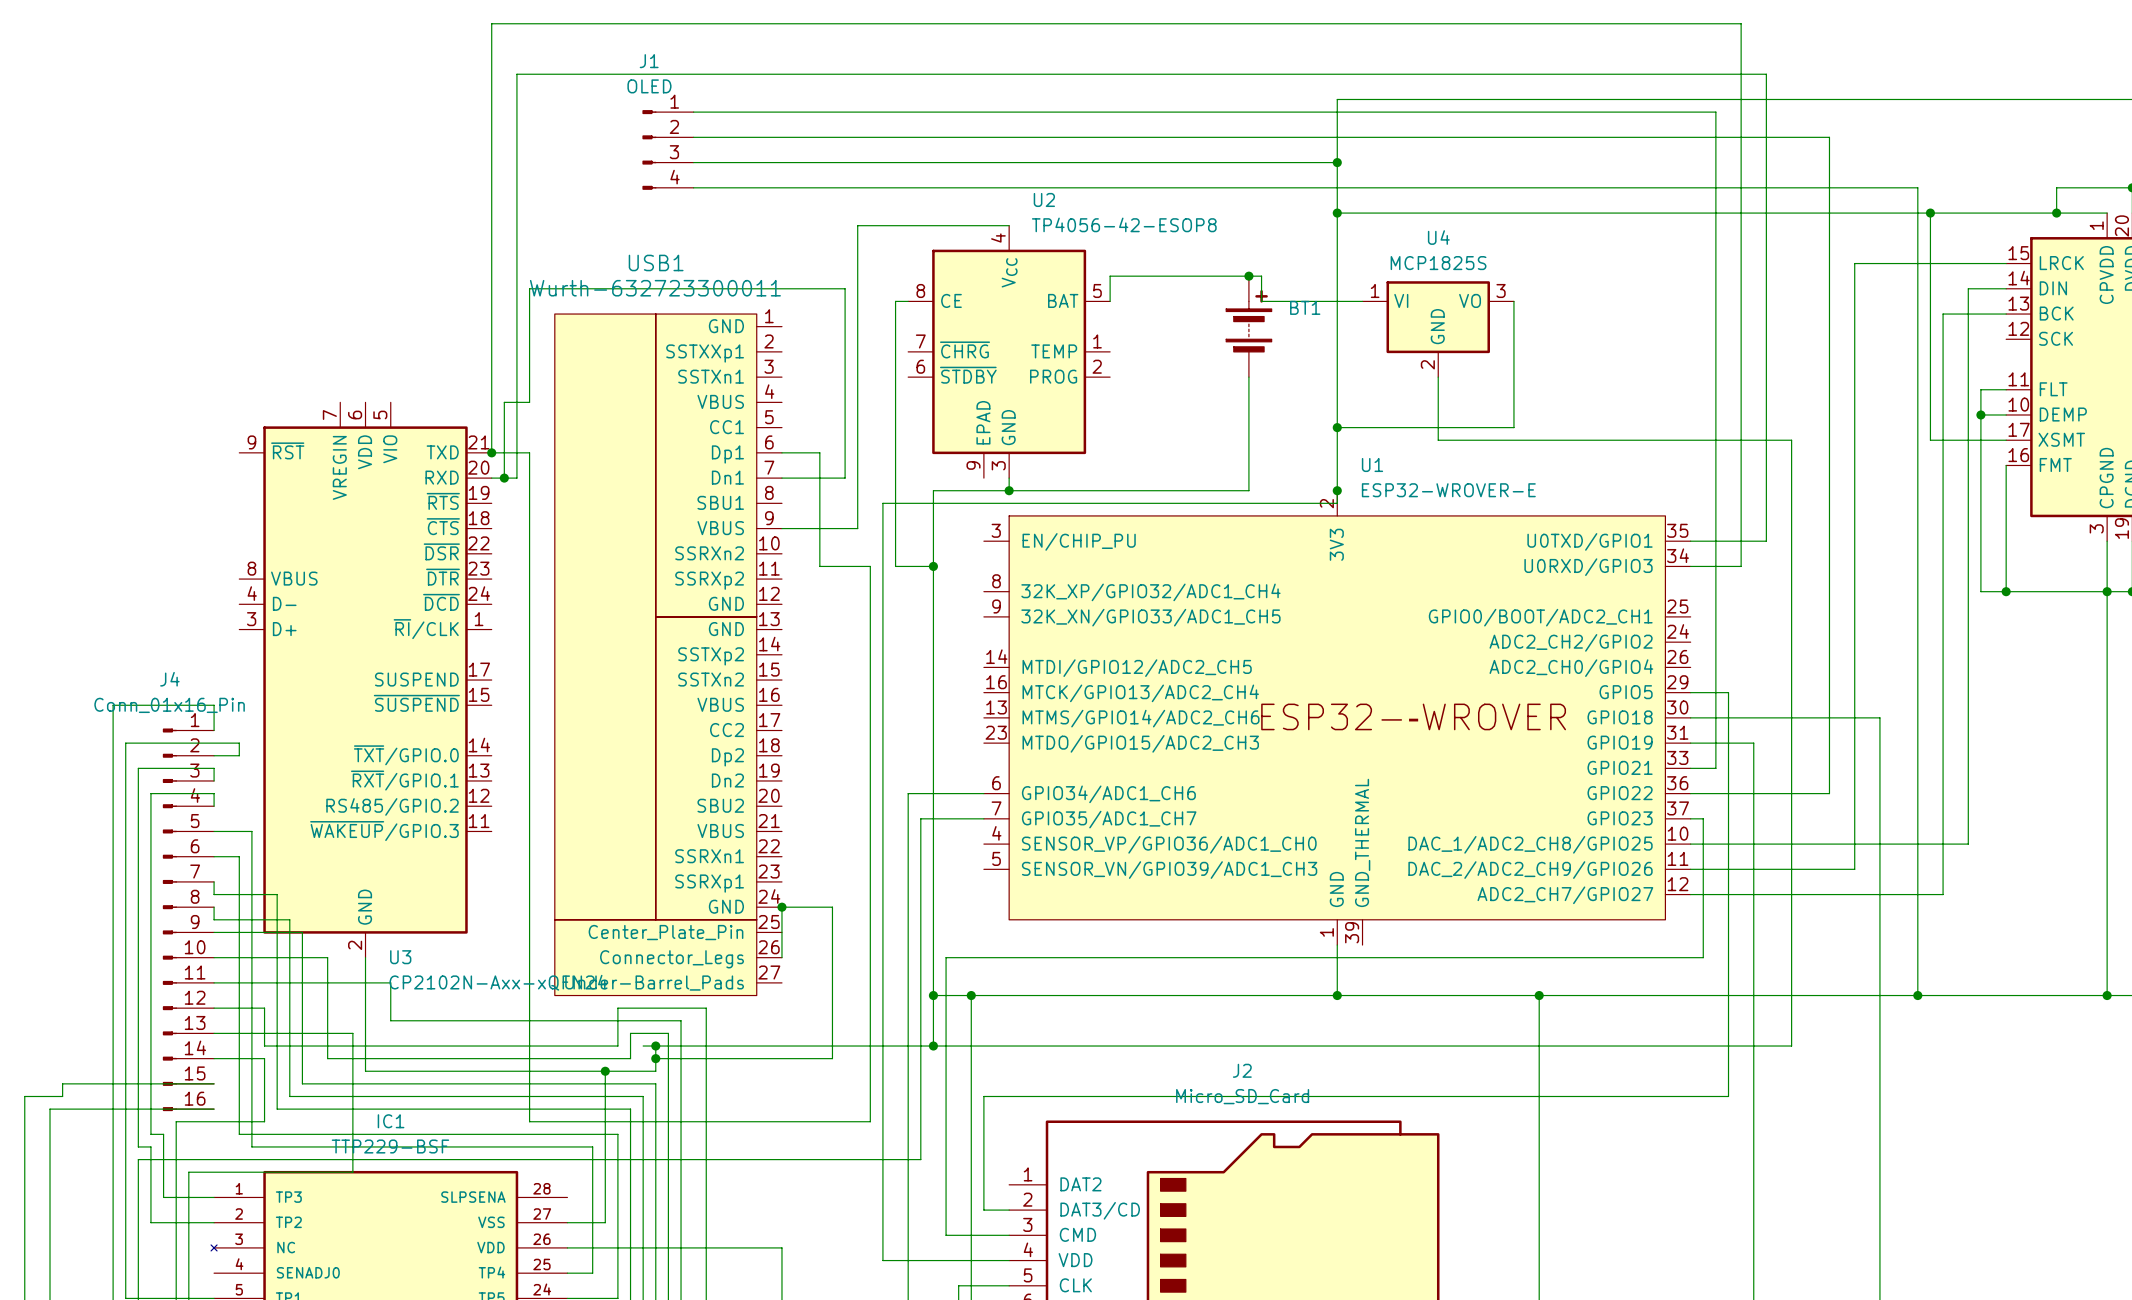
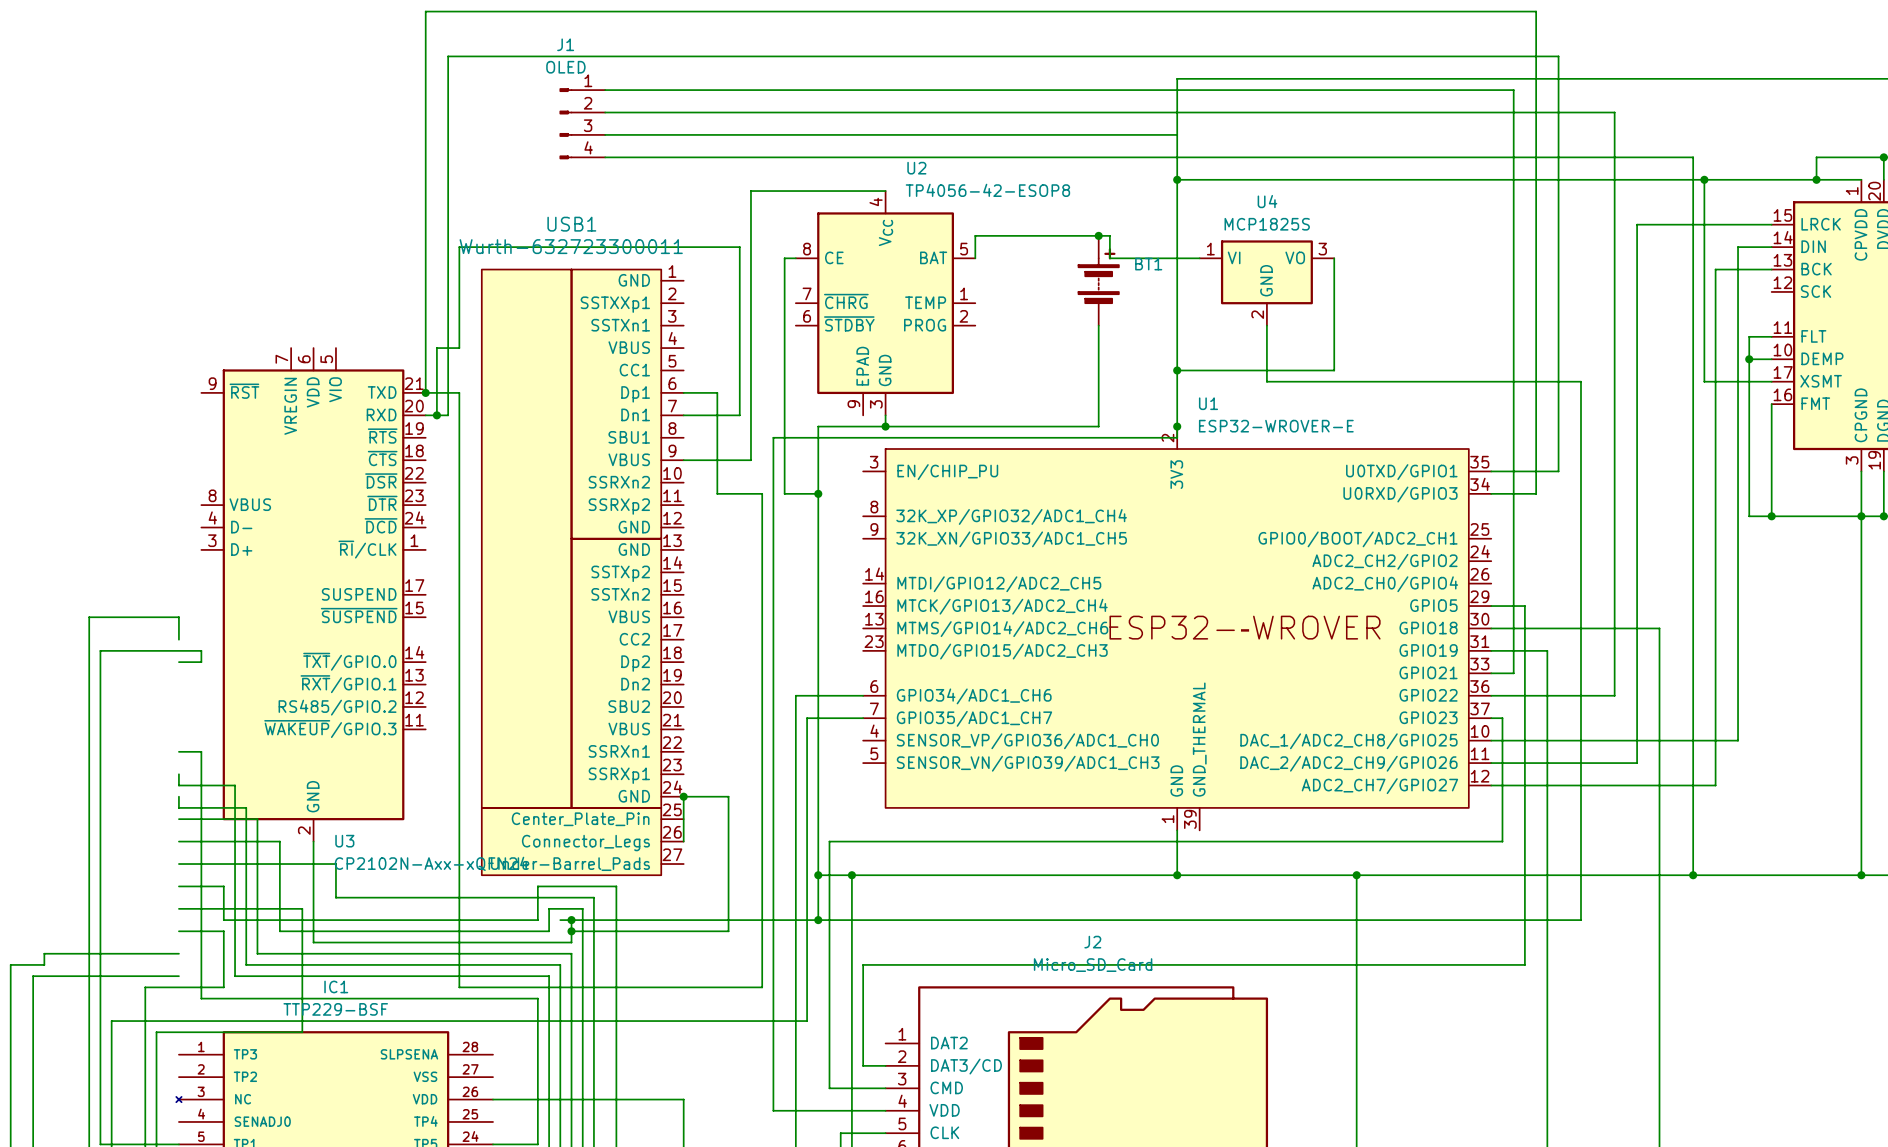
junction: (1337, 162) -> none
wire: (214, 780) (214, 768) (138, 768) (138, 1146) (150, 1146) (150, 1222) (214, 1222) -> none
wire: (214, 806) (214, 793) (150, 793) (150, 1134) (163, 1134) (163, 1197) (214, 1197) -> none
wire: (214, 831) (251, 831) (251, 1146) (592, 1146) (592, 1273) (567, 1273) -> none
J4: Conn_01x16_Pin (188, 919) -> none
wire: (605, 1071) (605, 1222) (567, 1222) -> none
junction: (605, 1071) -> none

